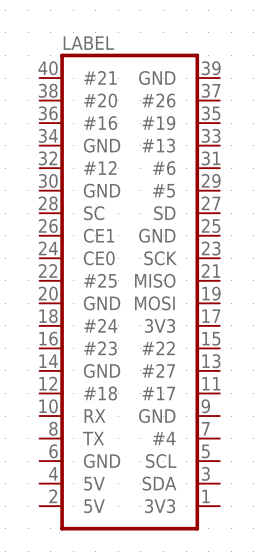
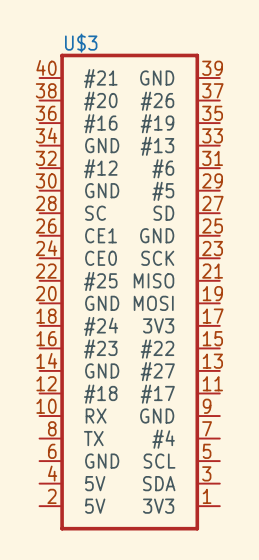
LABEL name: LABEL (88, 43) -> U$3 (81, 43)

